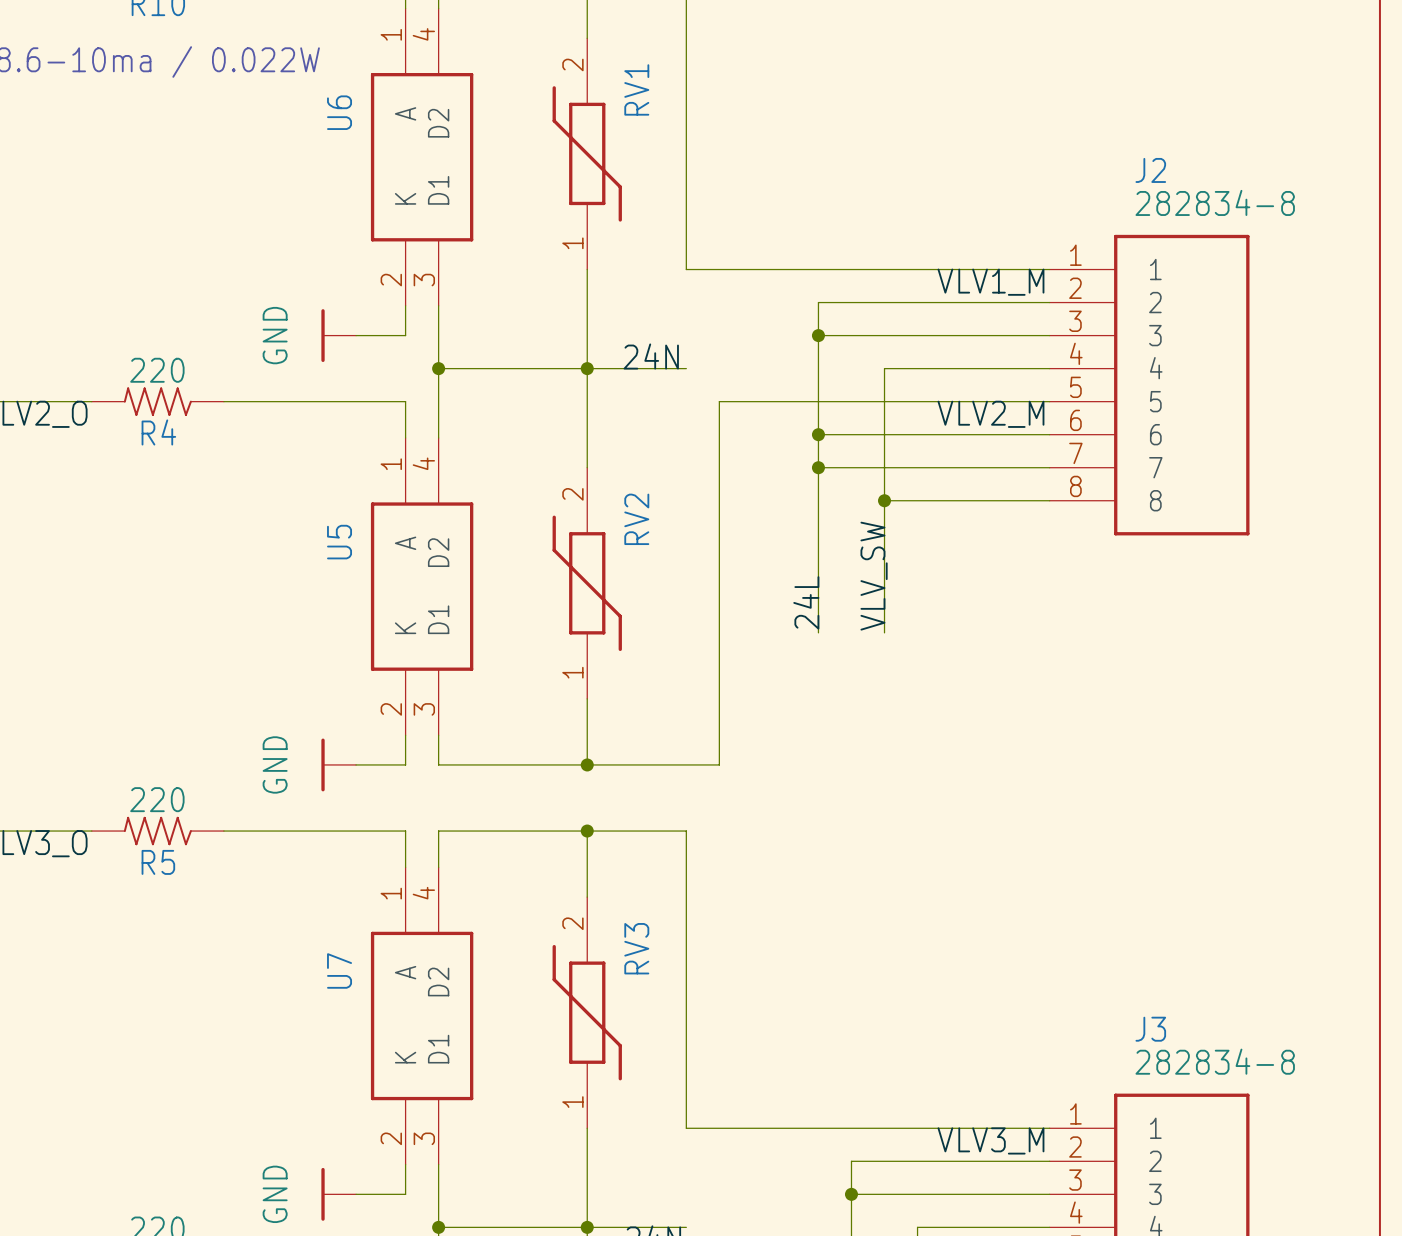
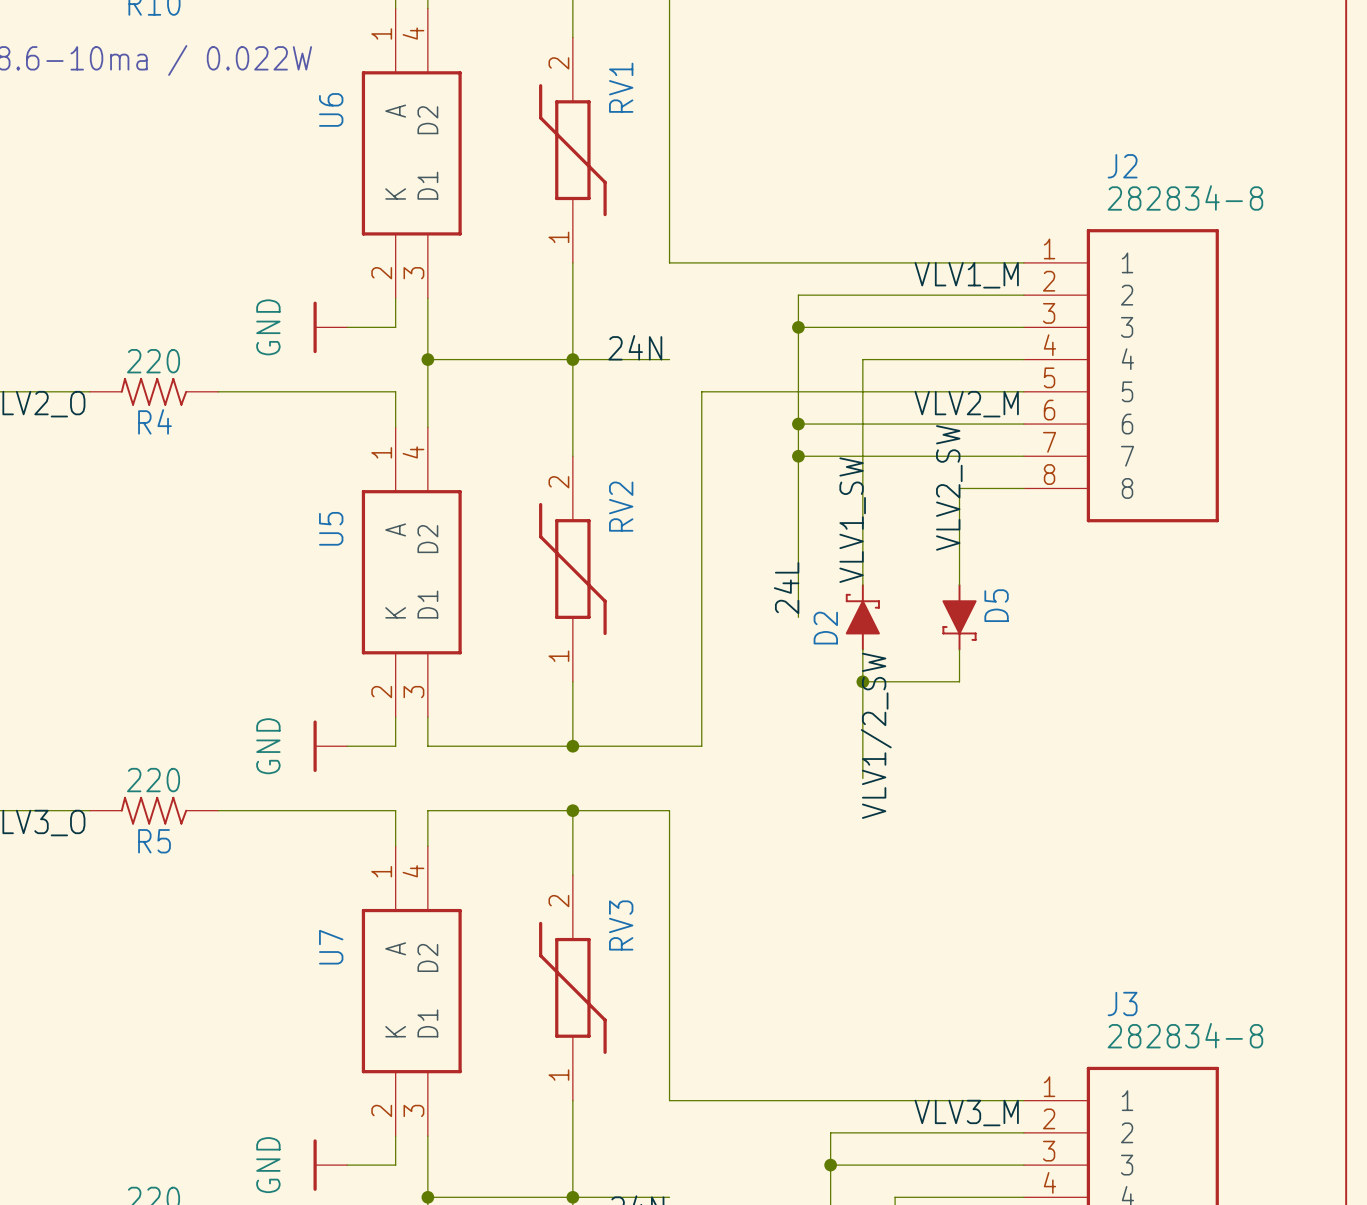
wire: (884, 500) (983, 500) -> (959, 585) (959, 488)
junction: (884, 500) -> none
label: none -> VLV2_SW (949, 487)
label: VLV_SW (874, 576) -> VLV1_SW (852, 520)
D2: none -> (862, 617)
D5: none -> (959, 617)
wire: none -> (862, 649) (862, 778)
wire: none -> (959, 649) (959, 681) (862, 681)
junction: none -> (862, 681)
label: none -> VLV1/2_SW (876, 735)

